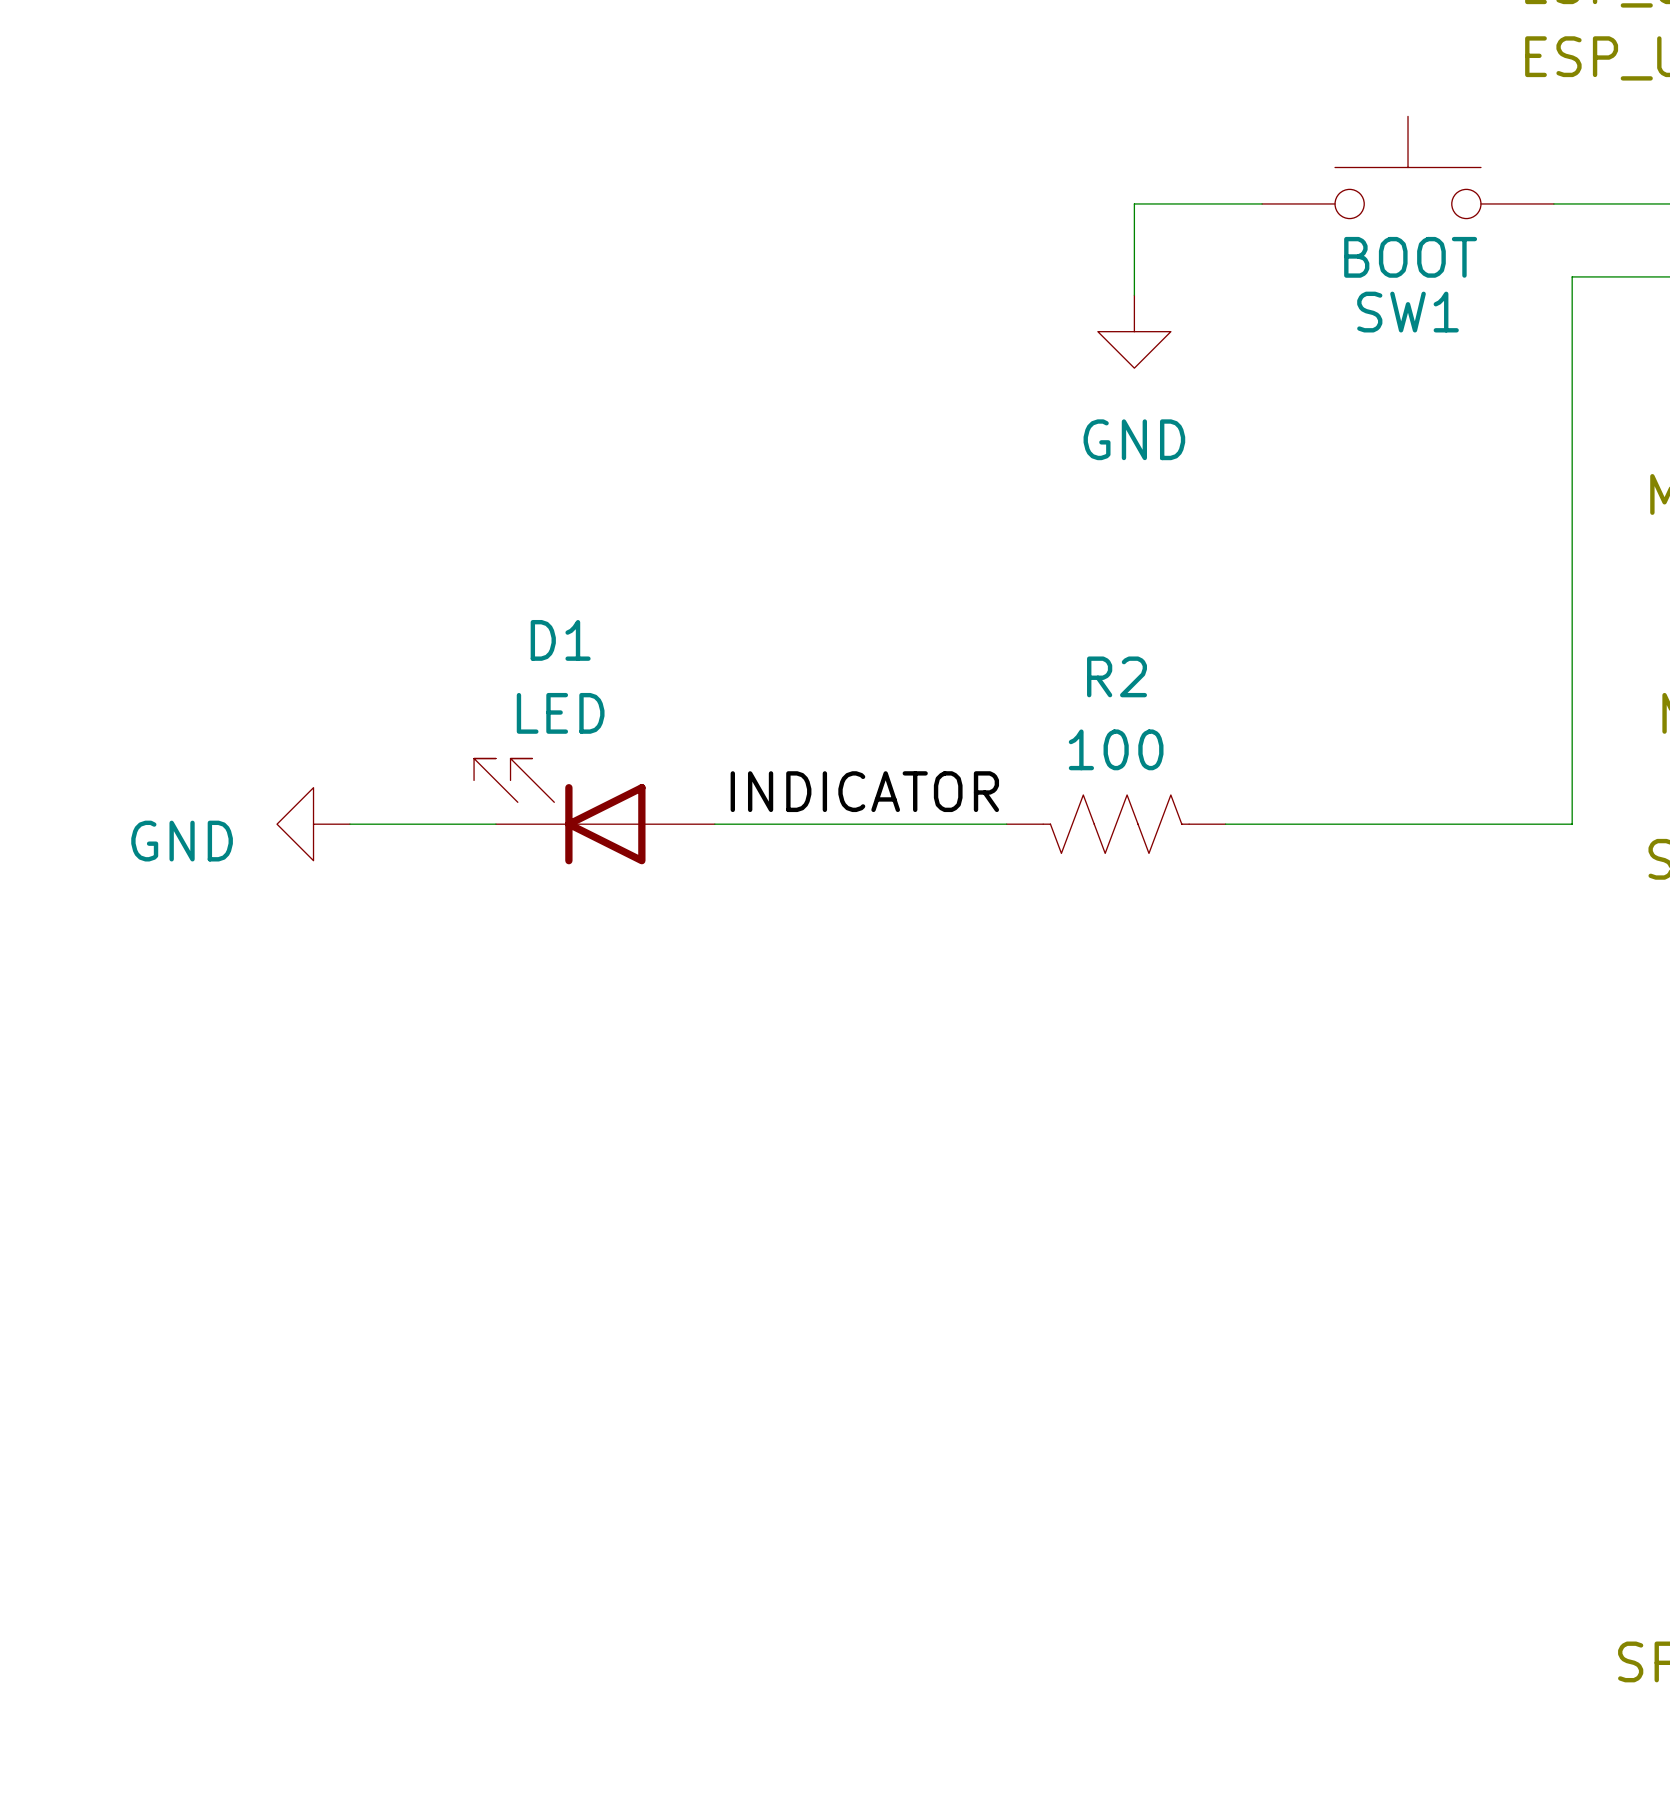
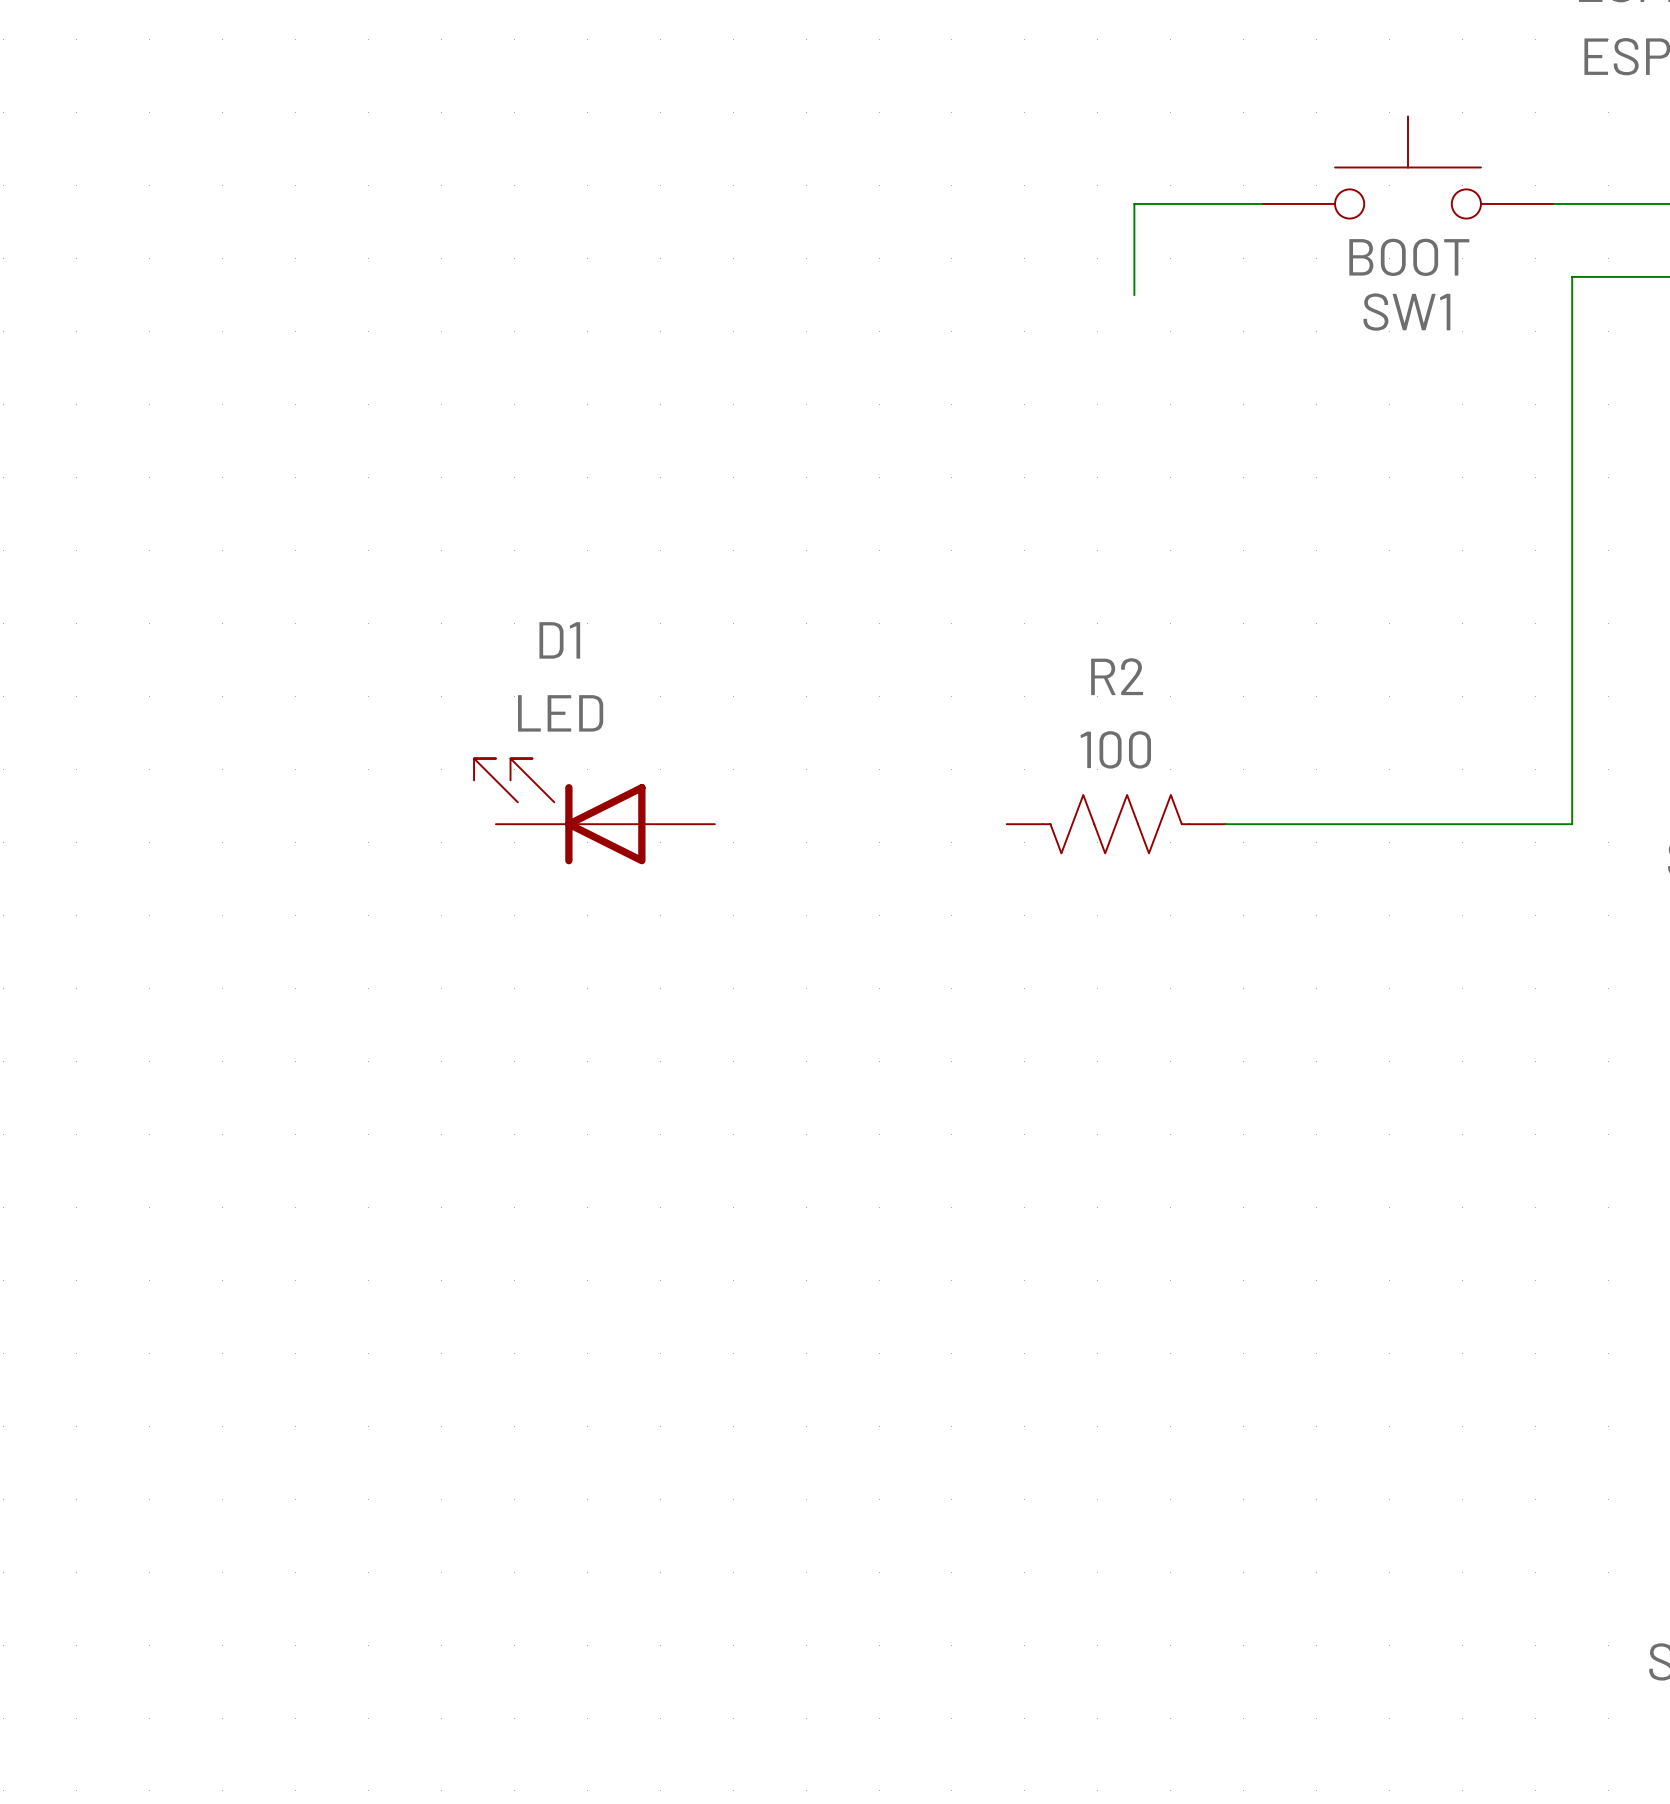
power symbol: GND (1134, 331) -> none
label: INDICATOR (864, 791) -> none
power symbol: GND (313, 824) -> none
wire: (350, 824) (495, 824) -> none
wire: (714, 824) (1006, 824) -> none

